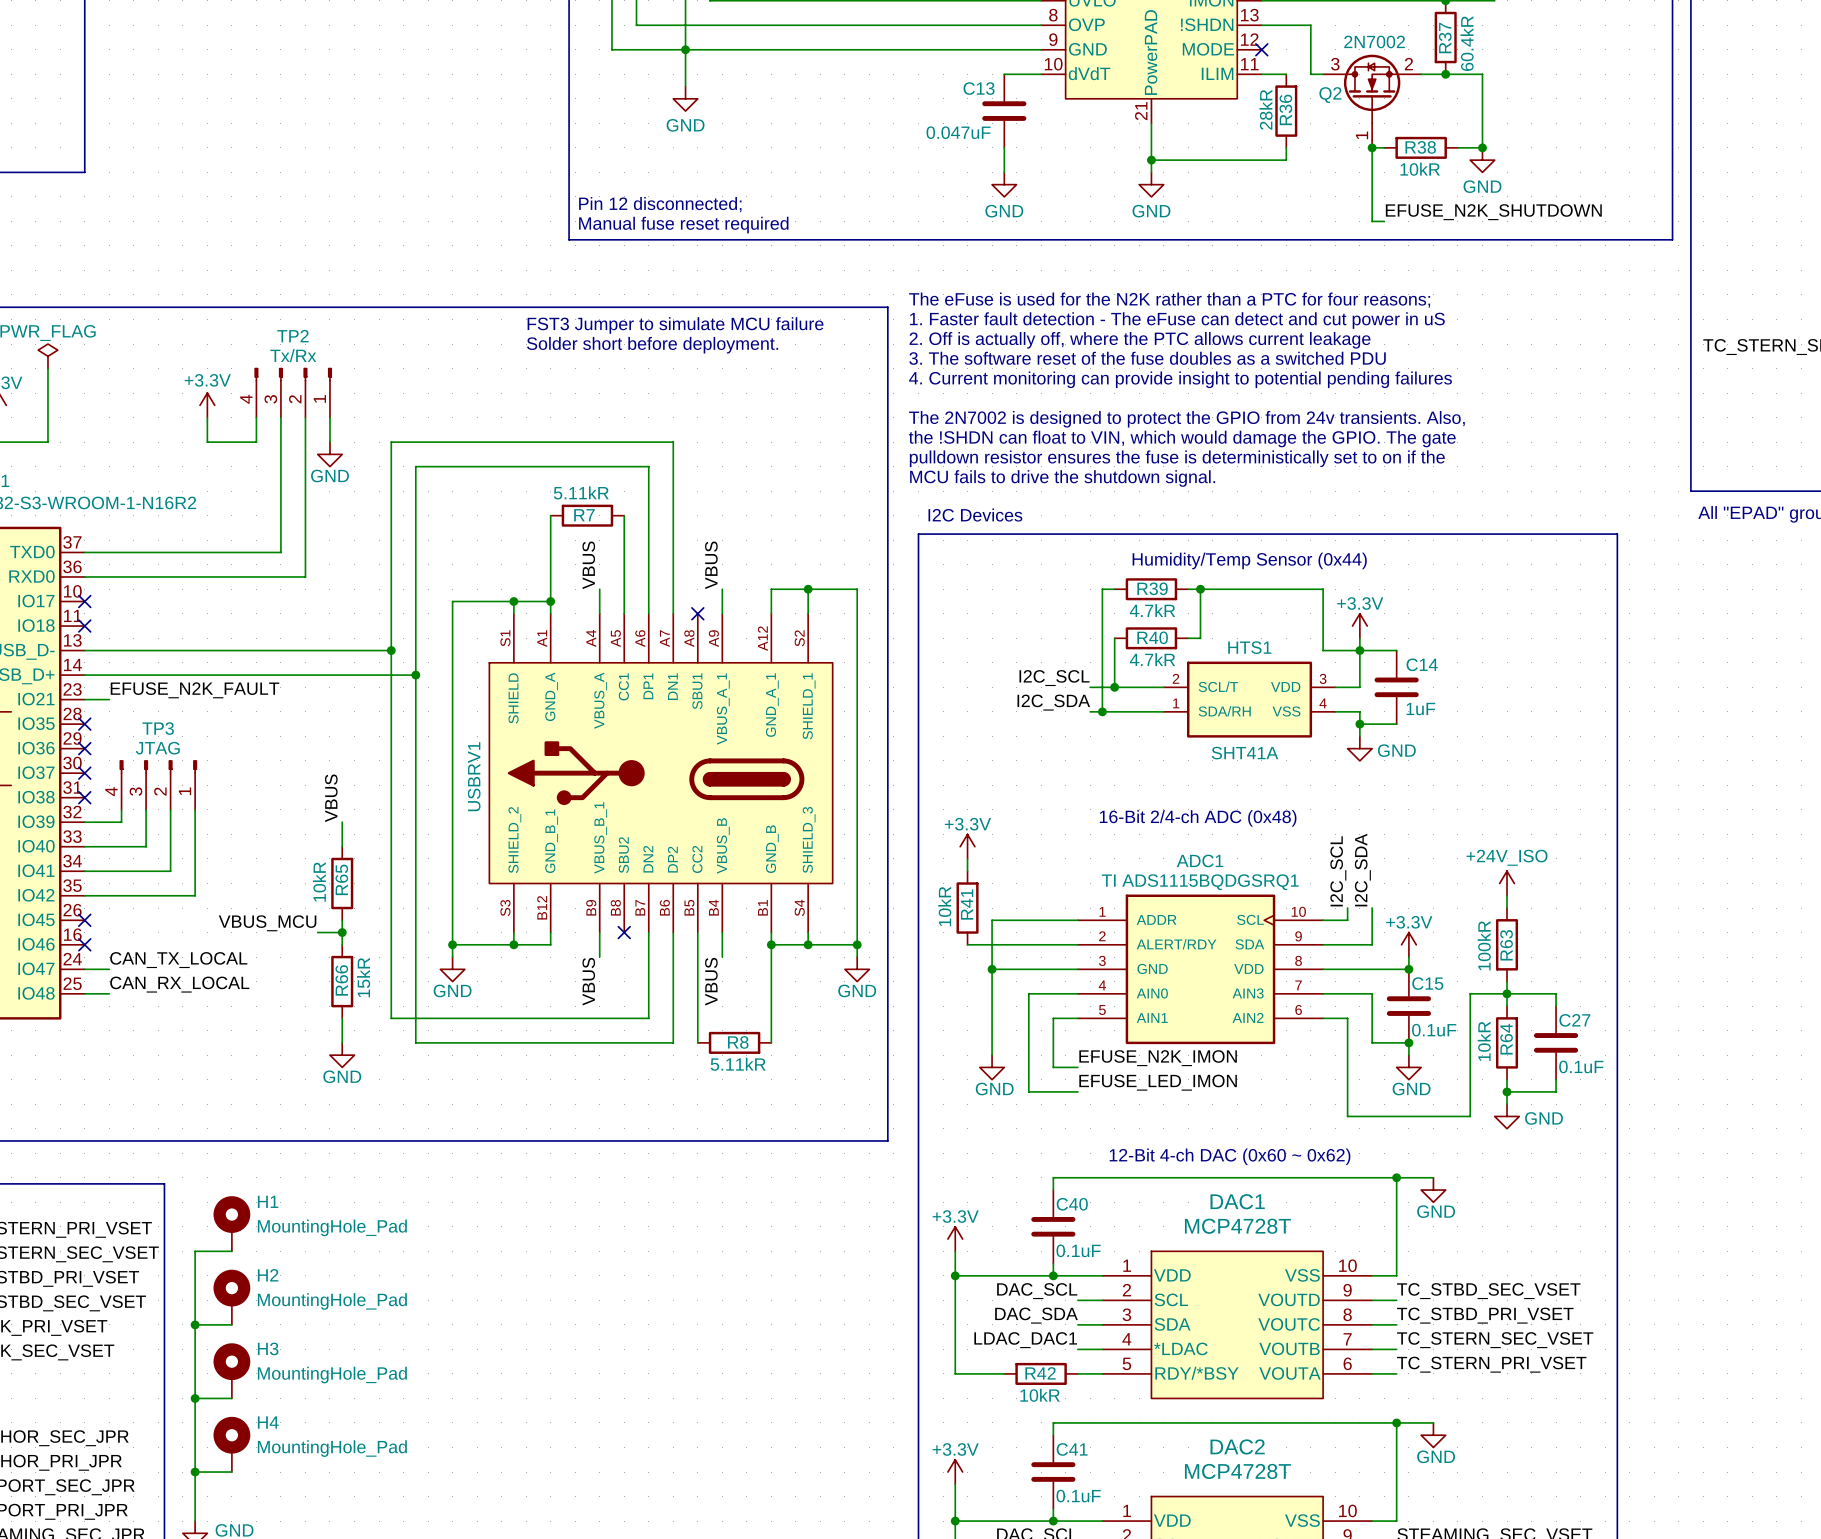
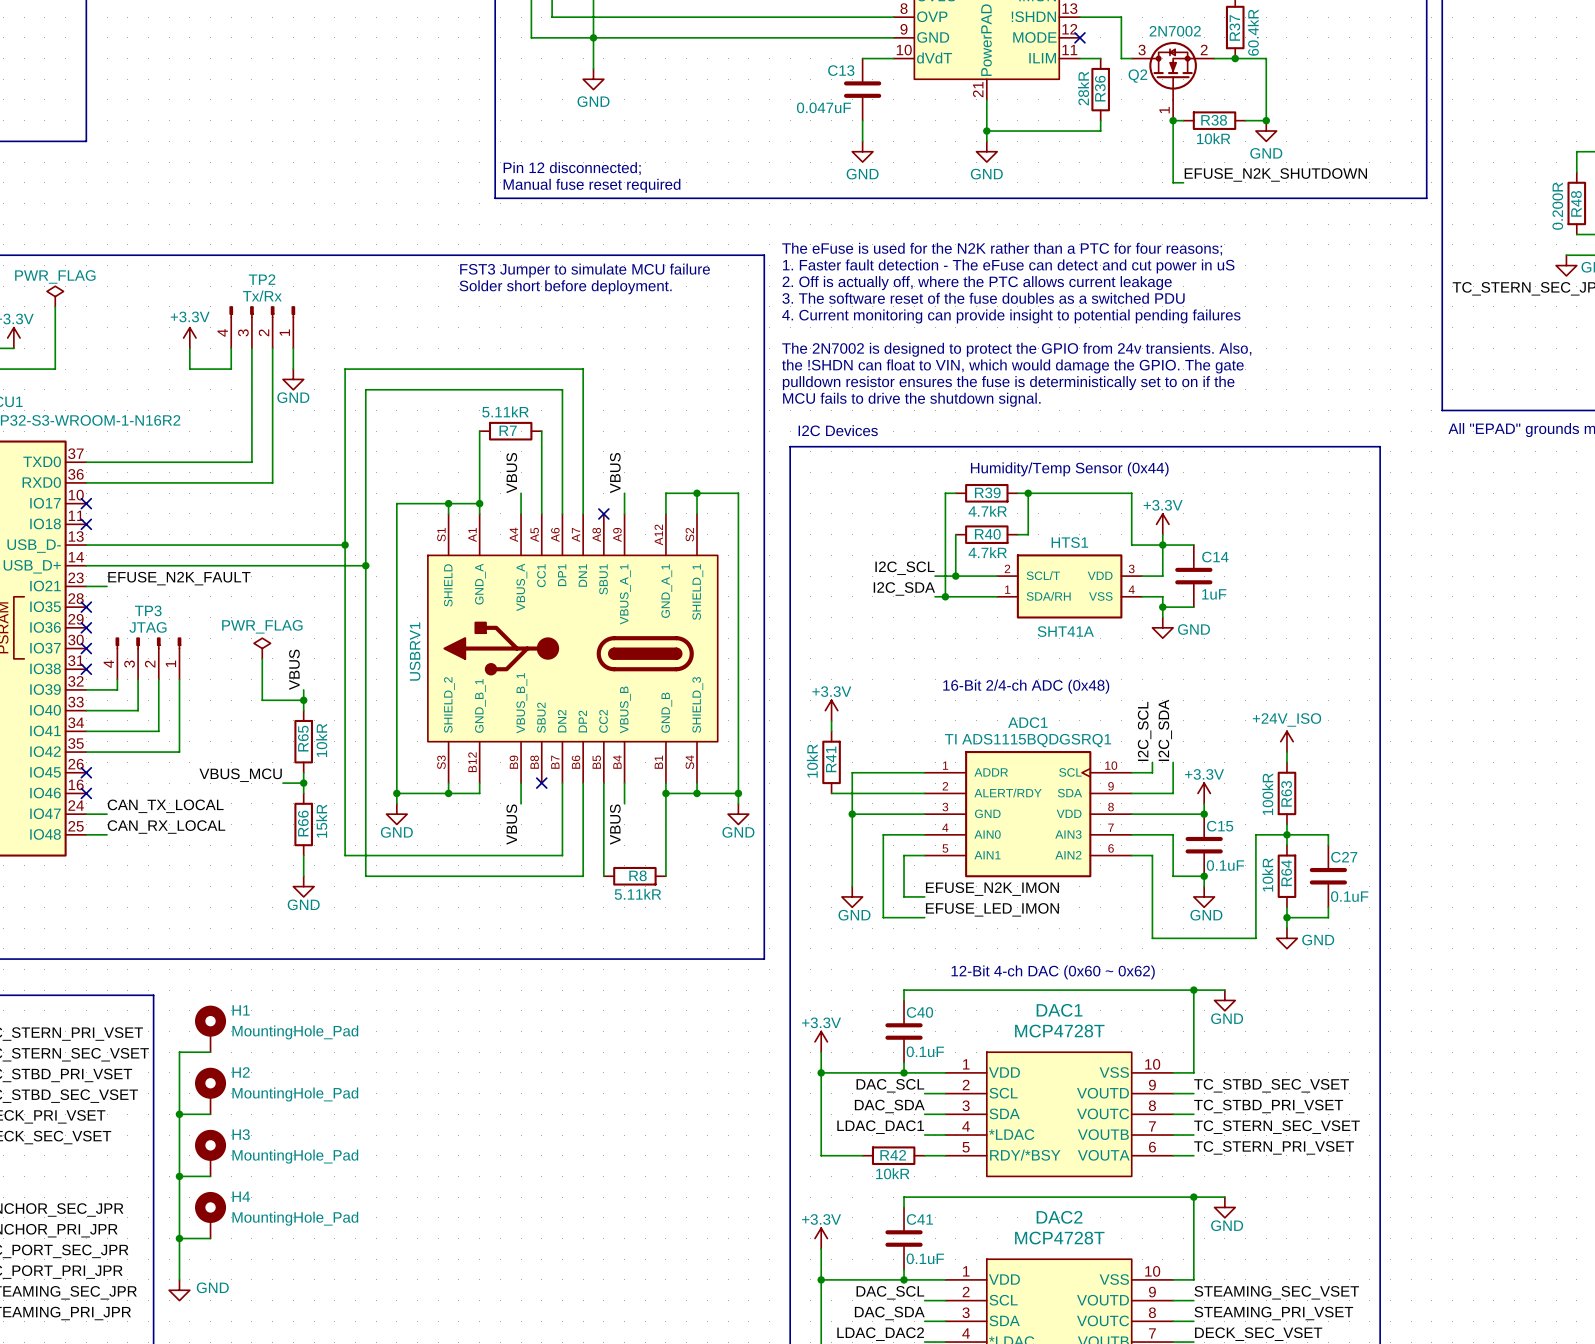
power symbol: none -> PWR_FLAG (262, 648)
wire: none -> (262, 658) (262, 700) (303, 700)
junction: none -> (303, 700)
R65 value position: 10kR (319, 881) -> 10kR (321, 740)

